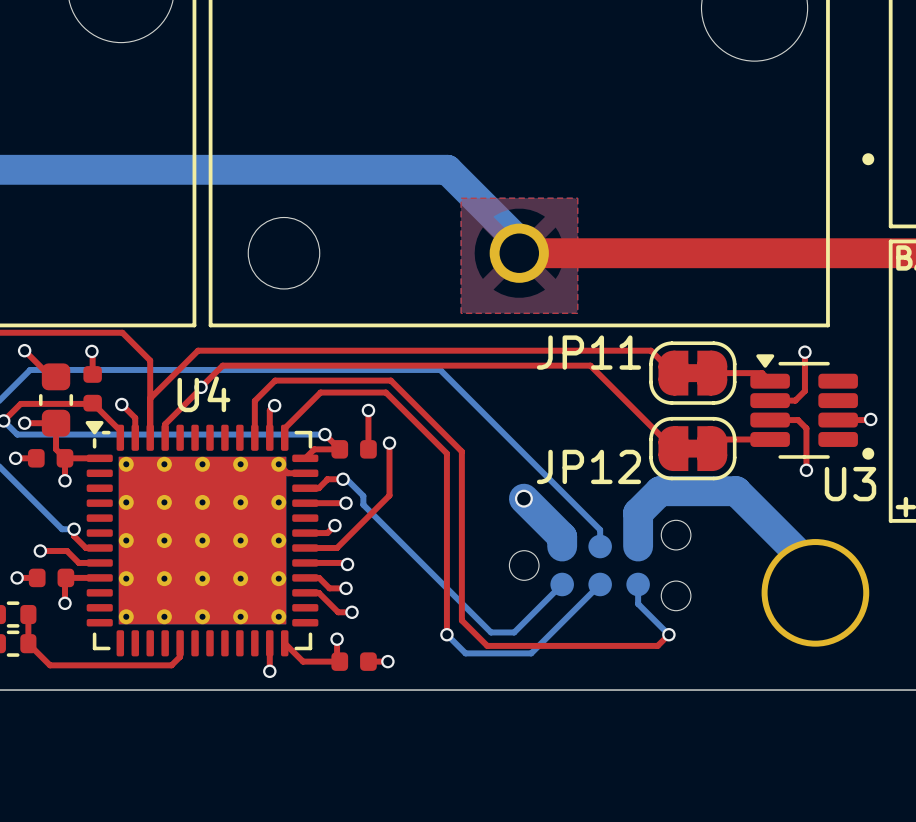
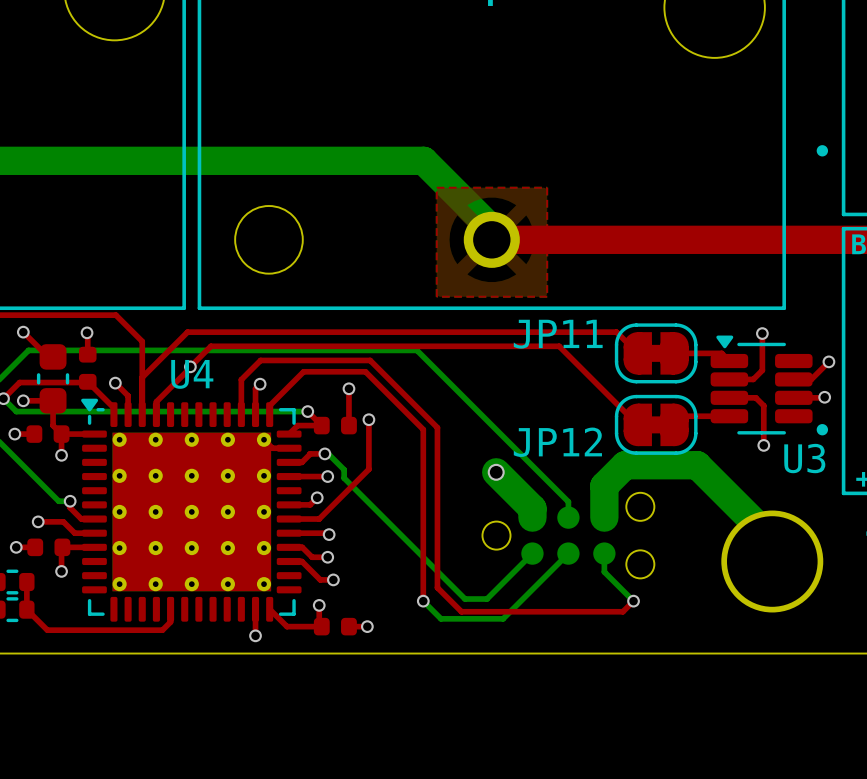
top track: none -> (828, 361) (811, 379) (793, 379)
via: none -> (828, 361)

